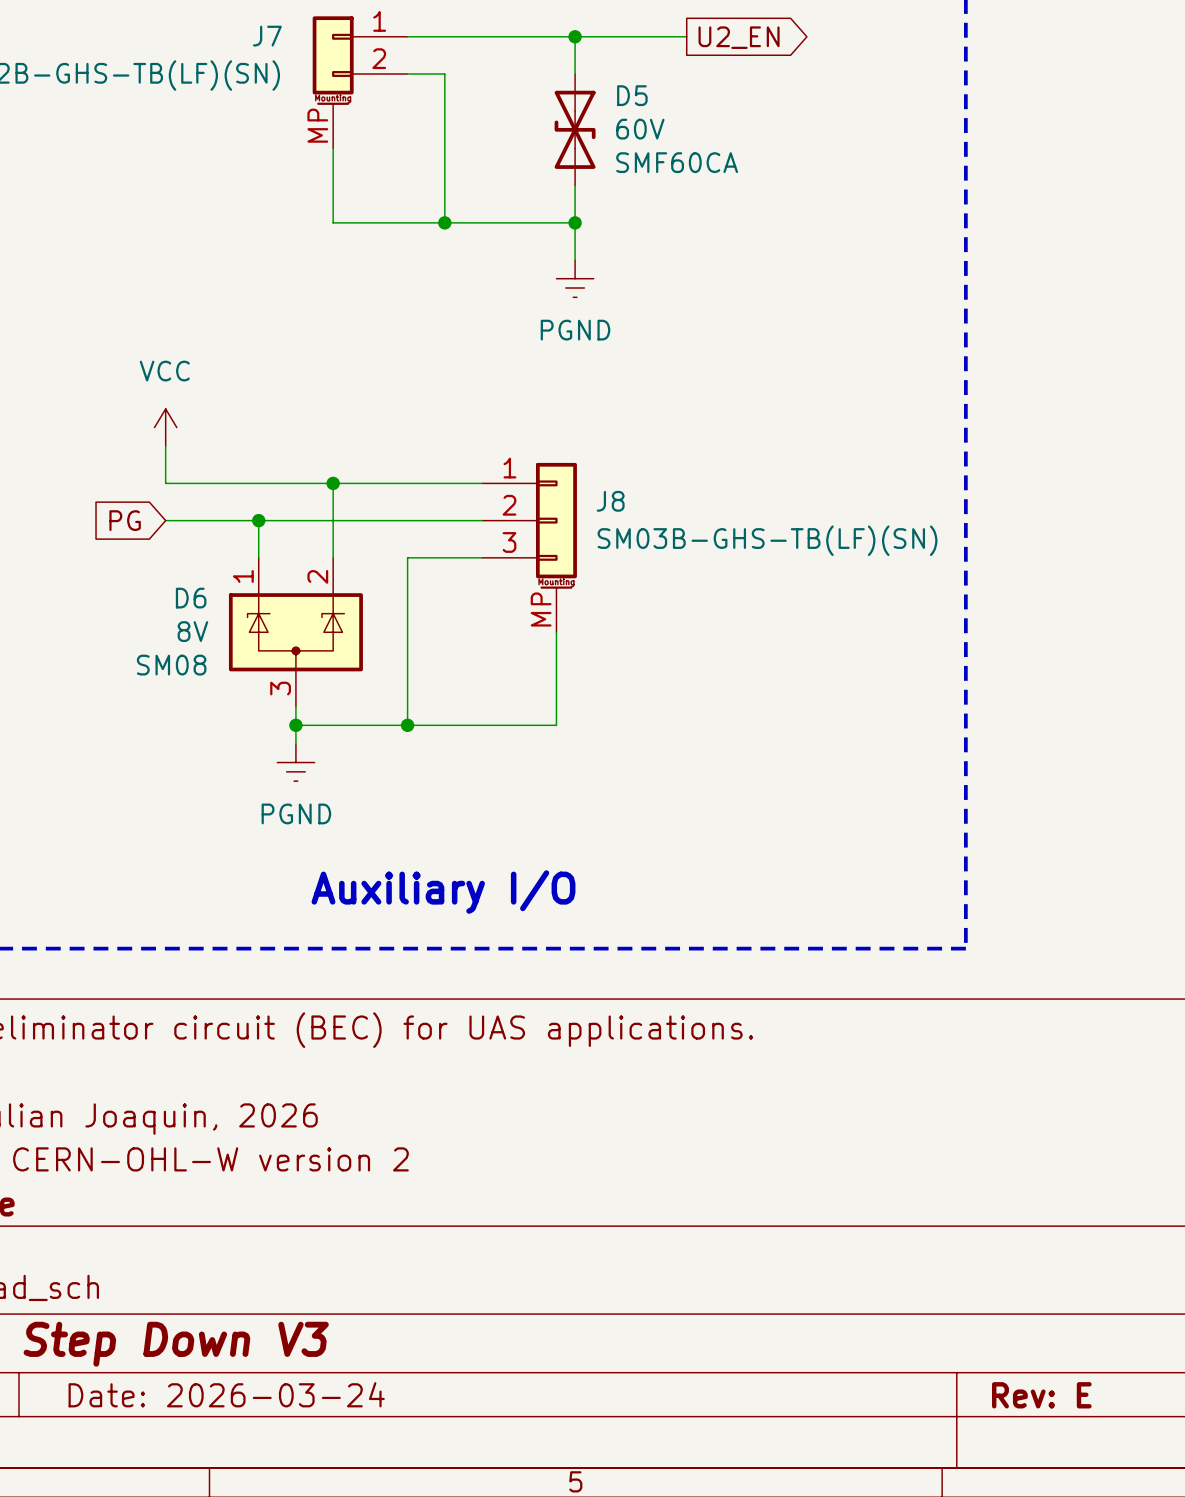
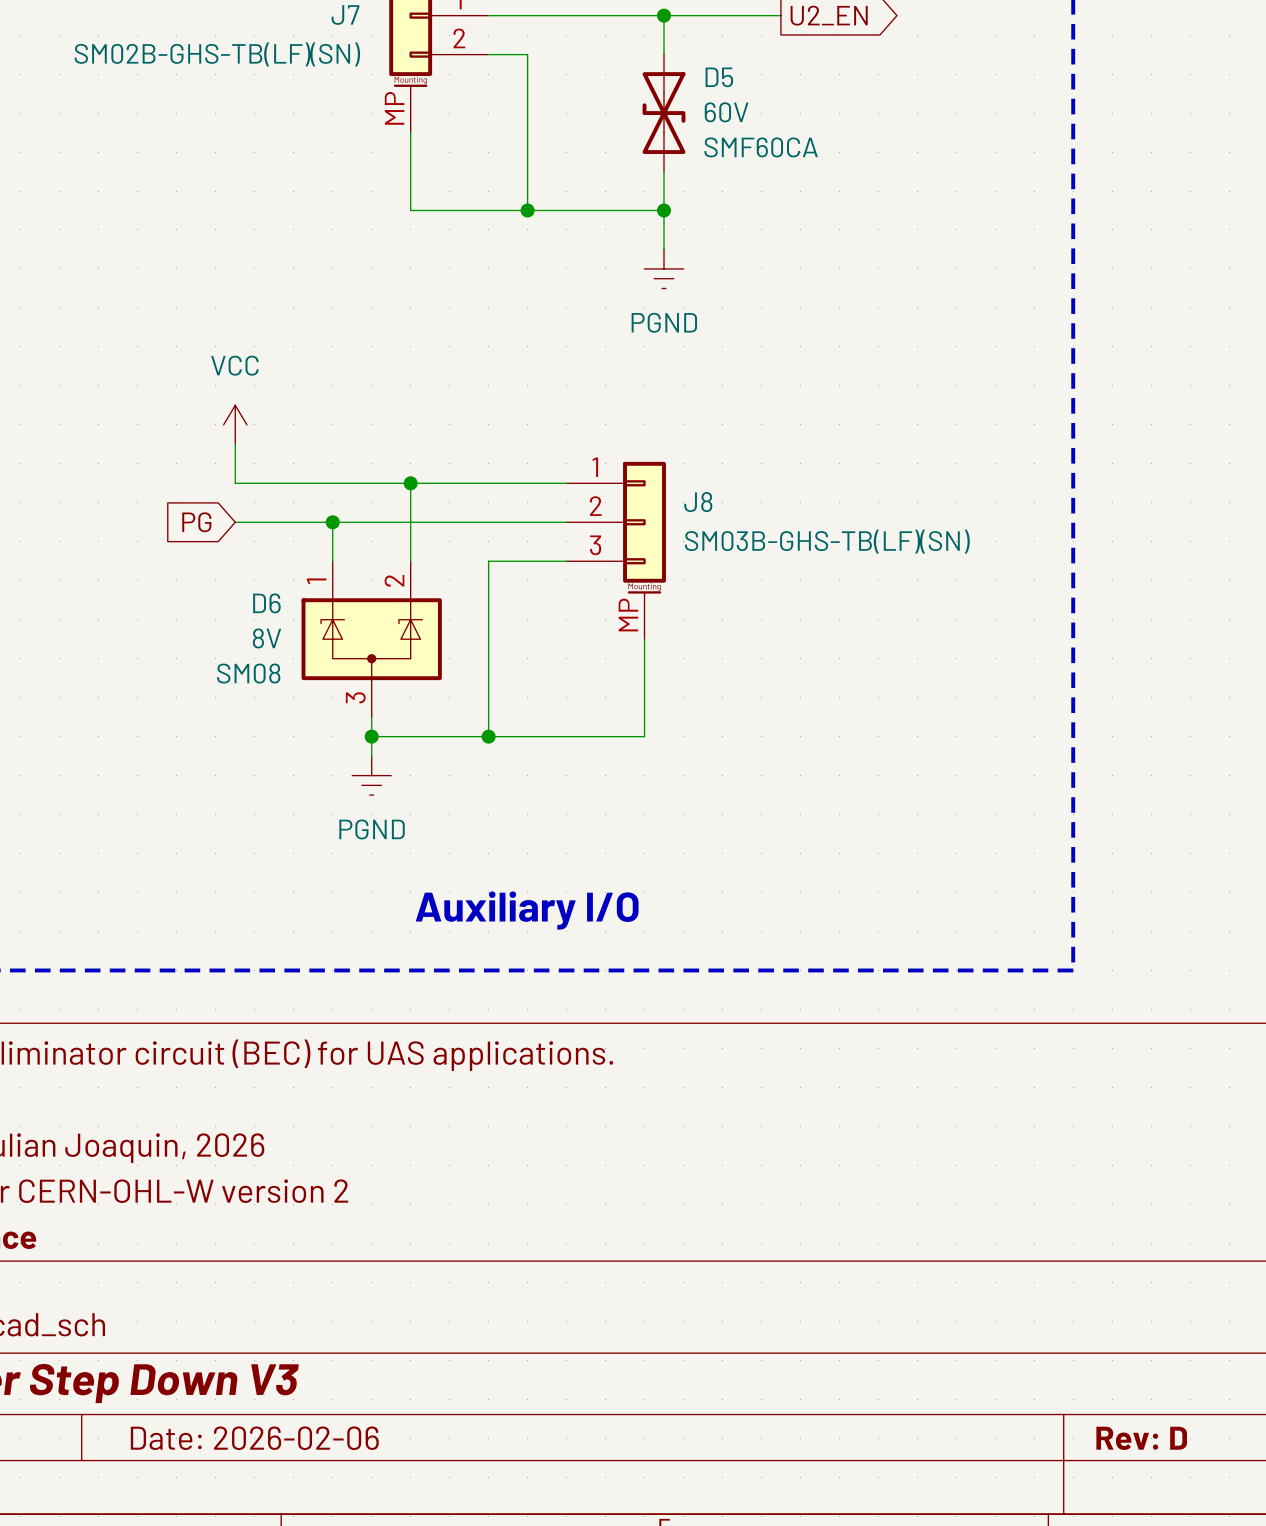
title block: Date: 2026-03-24 (226, 1394) -> Date: 2026-02-06 (254, 1438)
title block: Rev: E (1041, 1395) -> Rev: D (1141, 1438)

